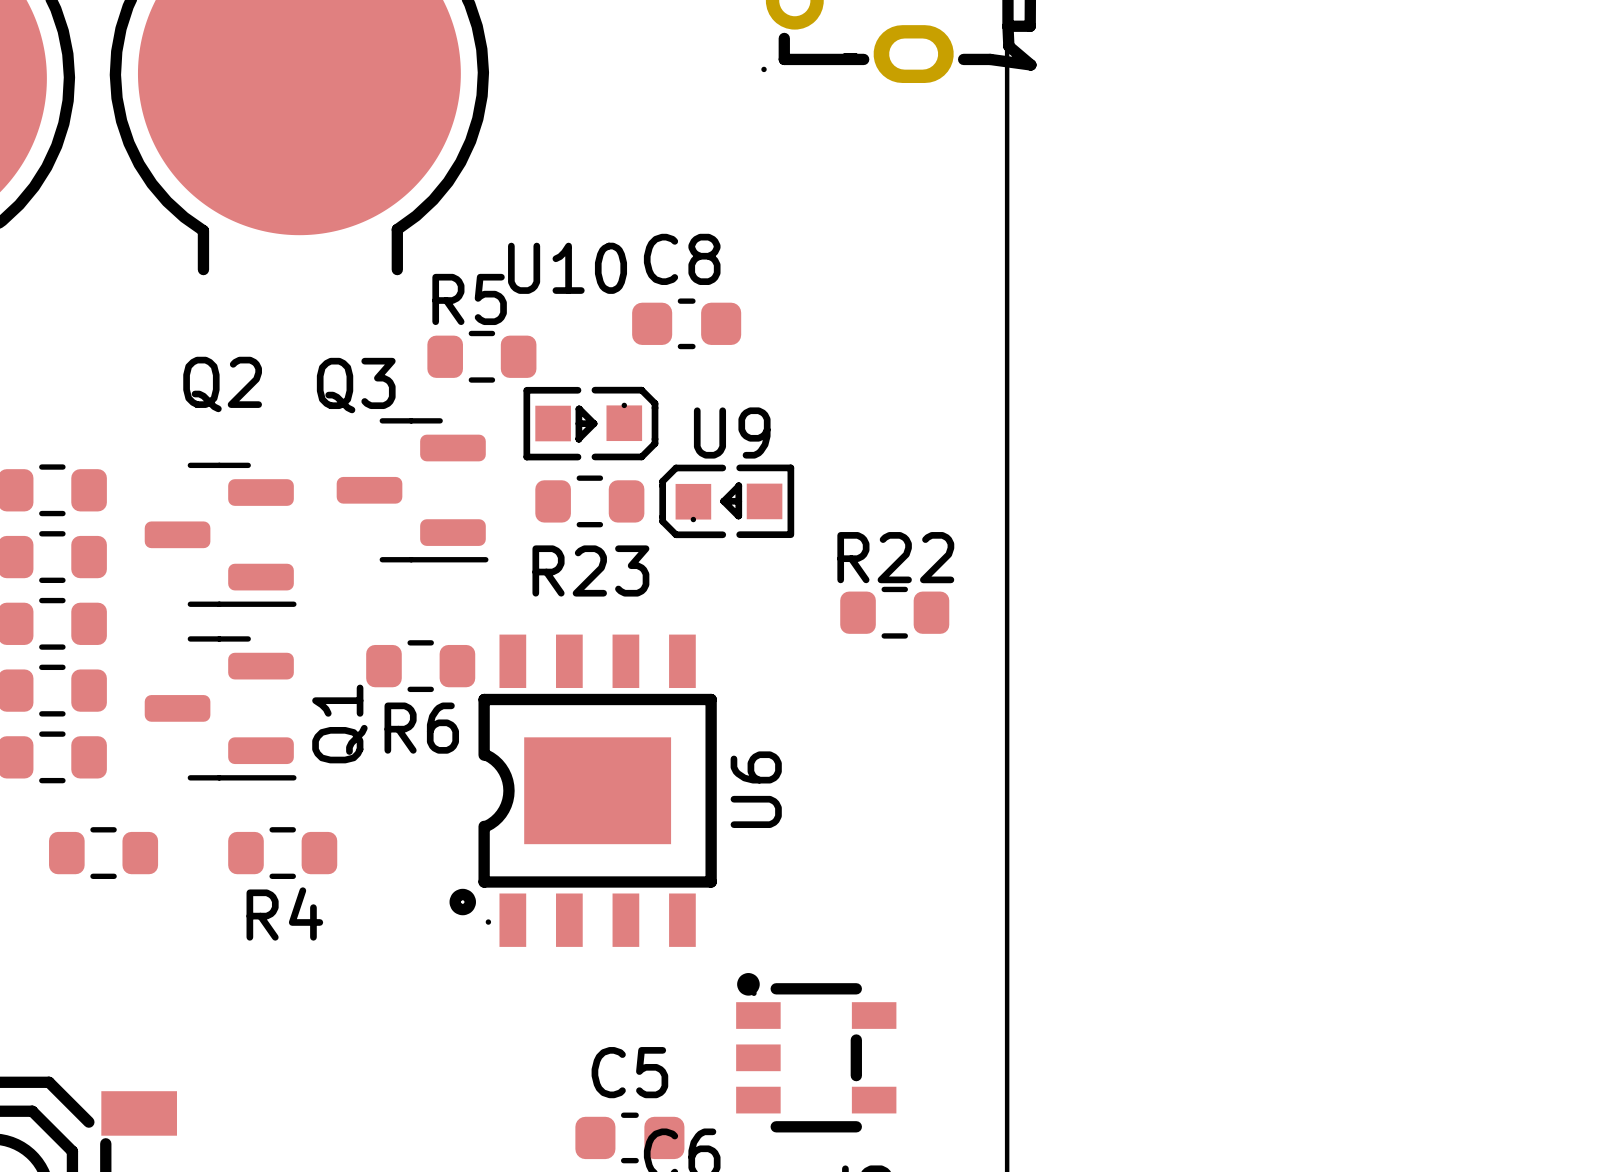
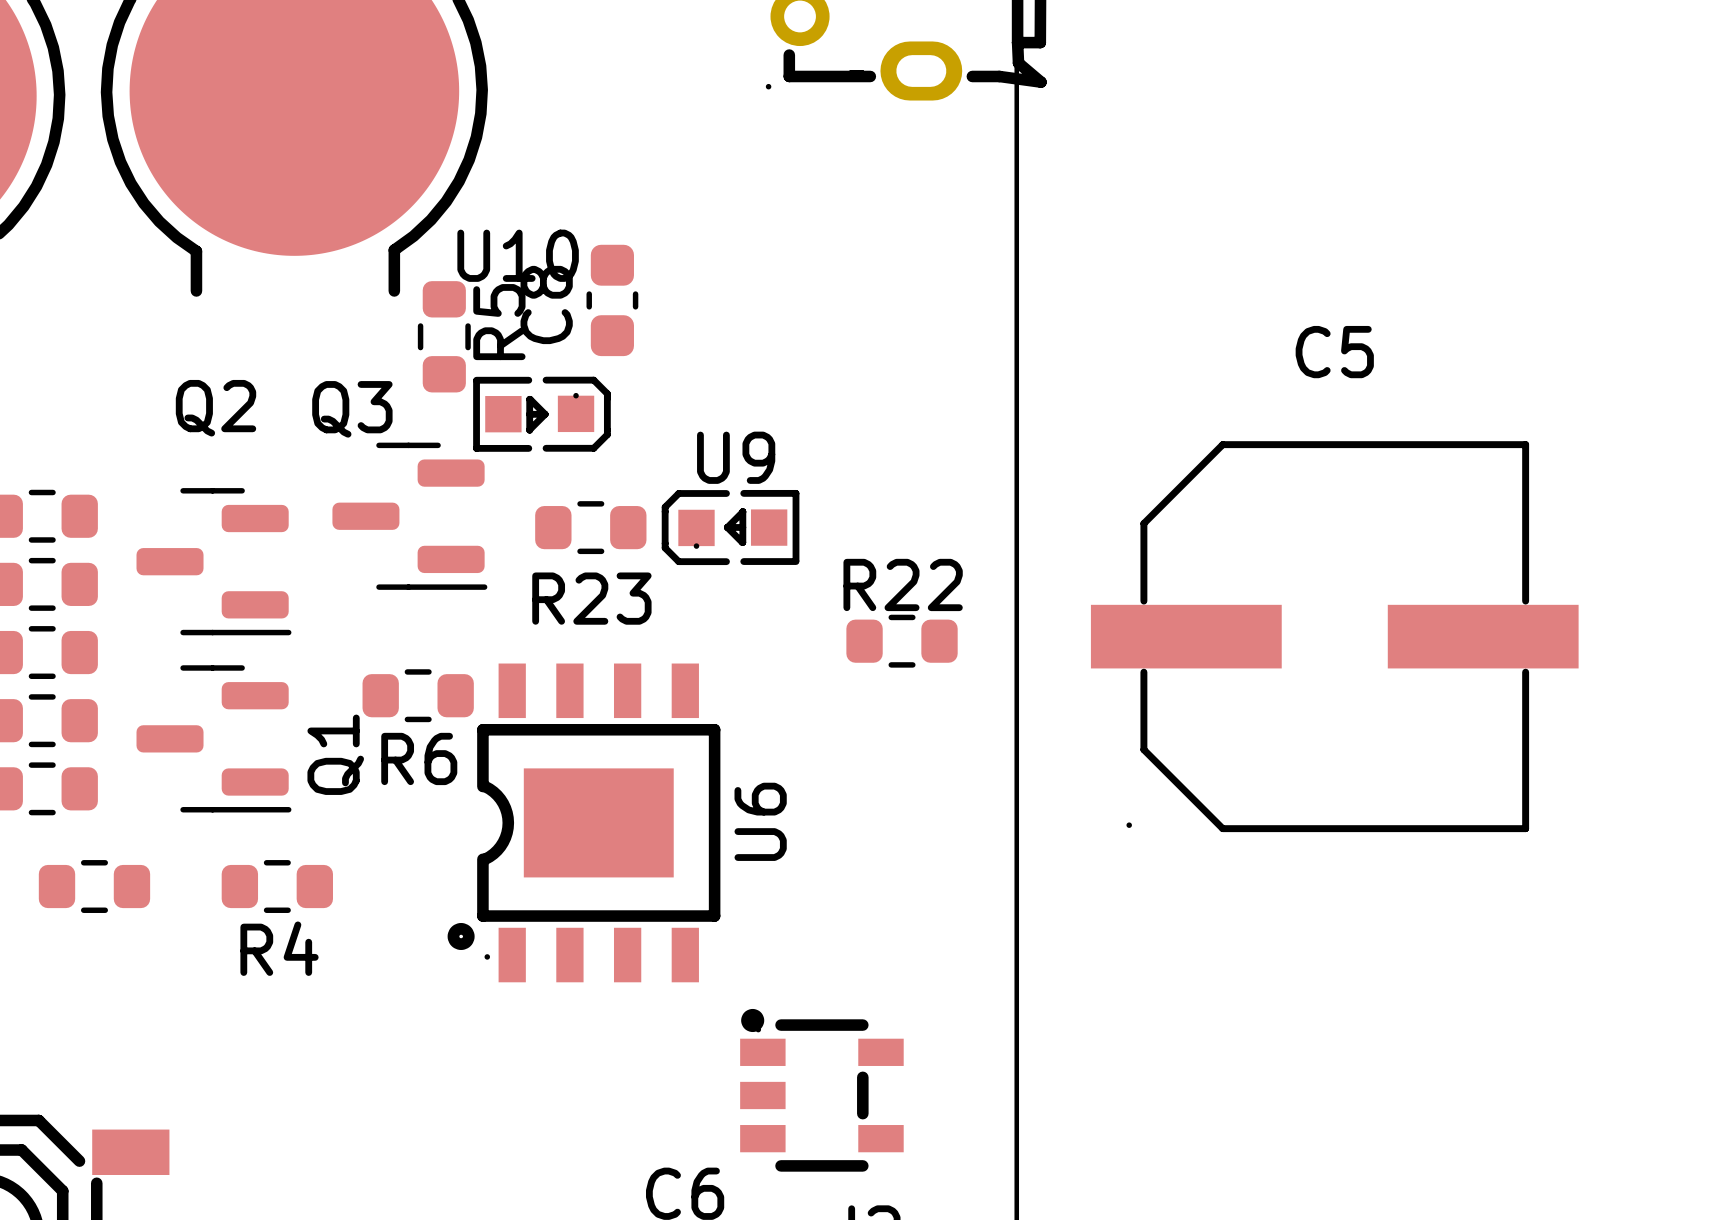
C8 rotation: 0° (686, 323) -> 90° clockwise (612, 300)
C8 position: (686, 323) -> (612, 300)
R5 rotation: 0° (481, 356) -> 90° clockwise (444, 336)
U10 footprint: [523, 386, 659, 461] -> [473, 376, 611, 452]
C5 name position: C5 (629, 1072) -> C5 (1334, 352)
C5 footprint: [575, 1112, 685, 1164] -> [1090, 441, 1579, 833]

